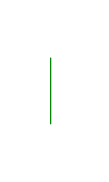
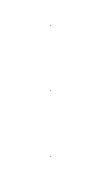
wire: (50, 58) (50, 123) -> none

